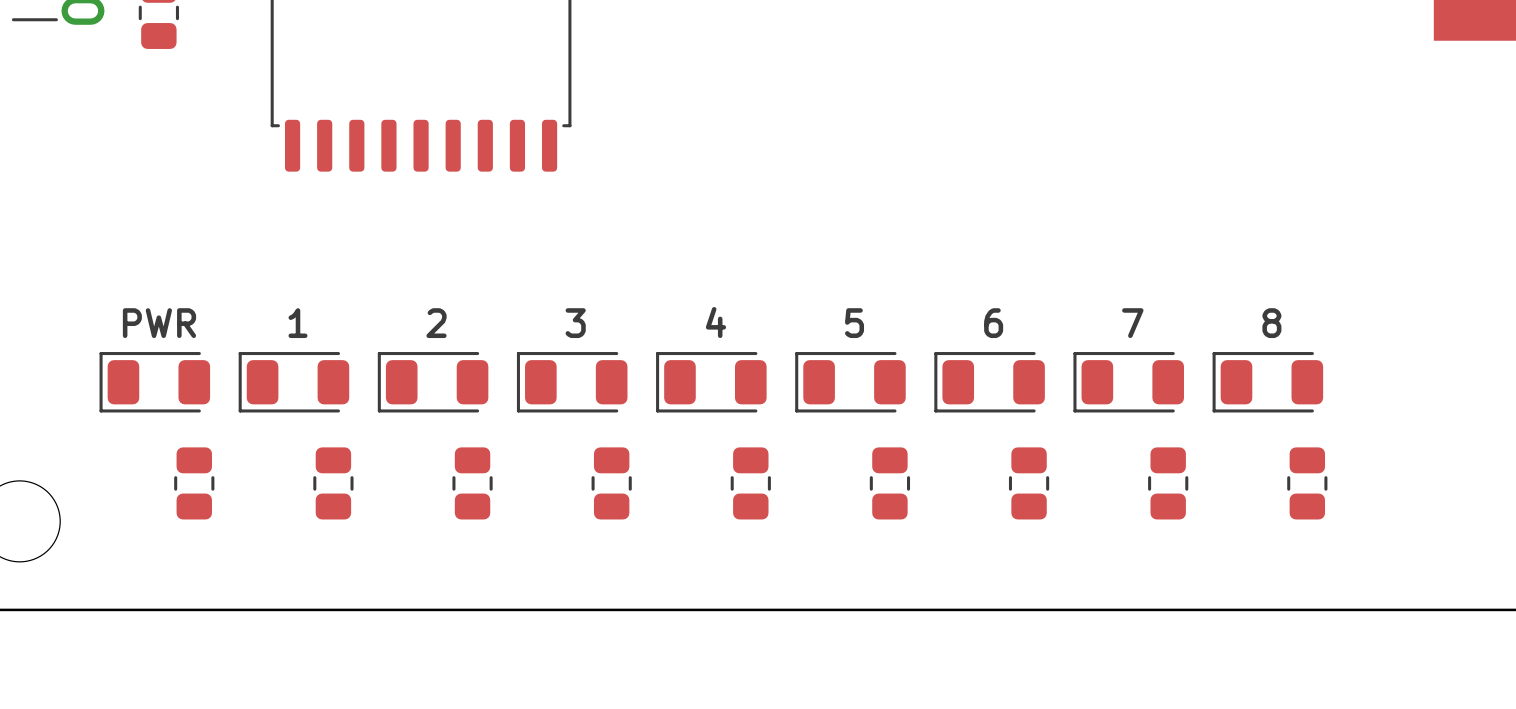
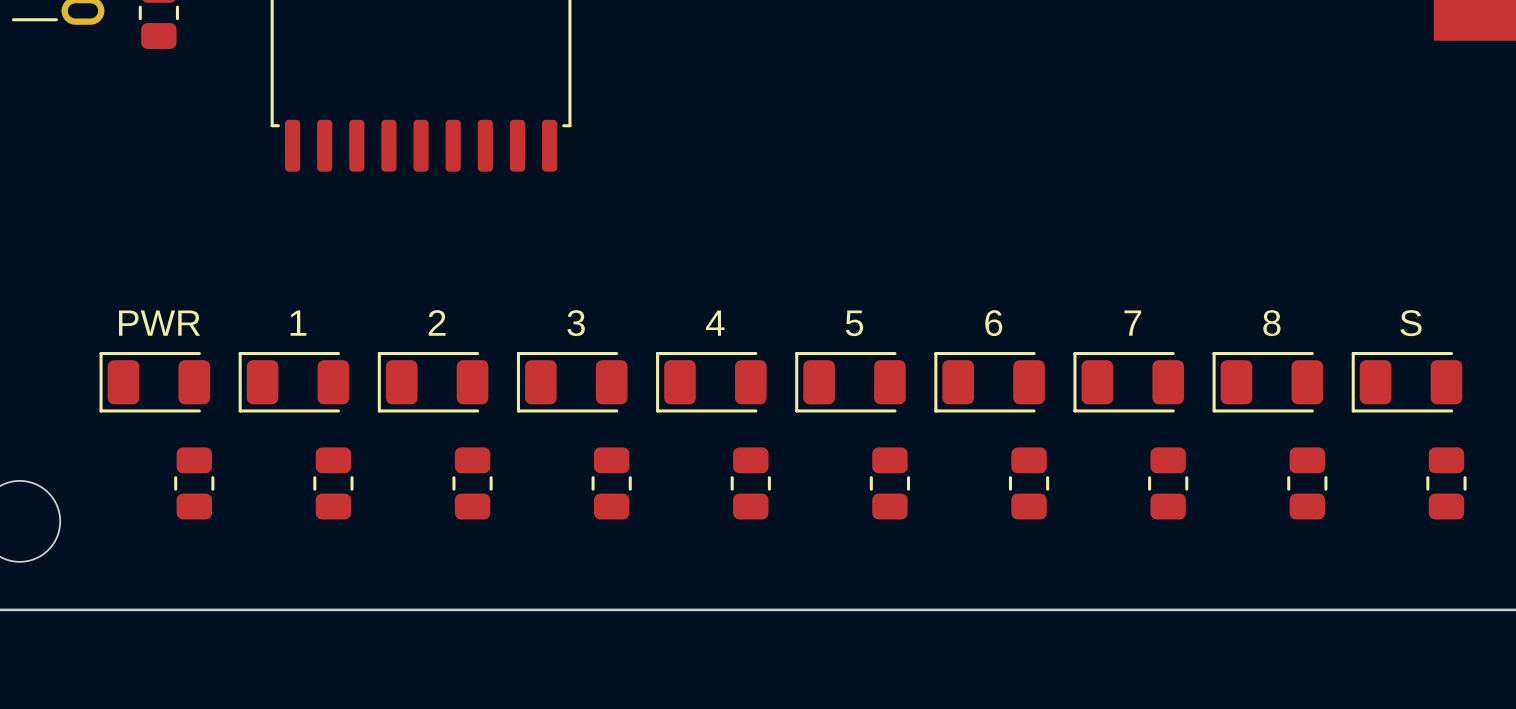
text: none -> S (1411, 323)
part: none -> (1406, 382)
part: none -> (1446, 483)

